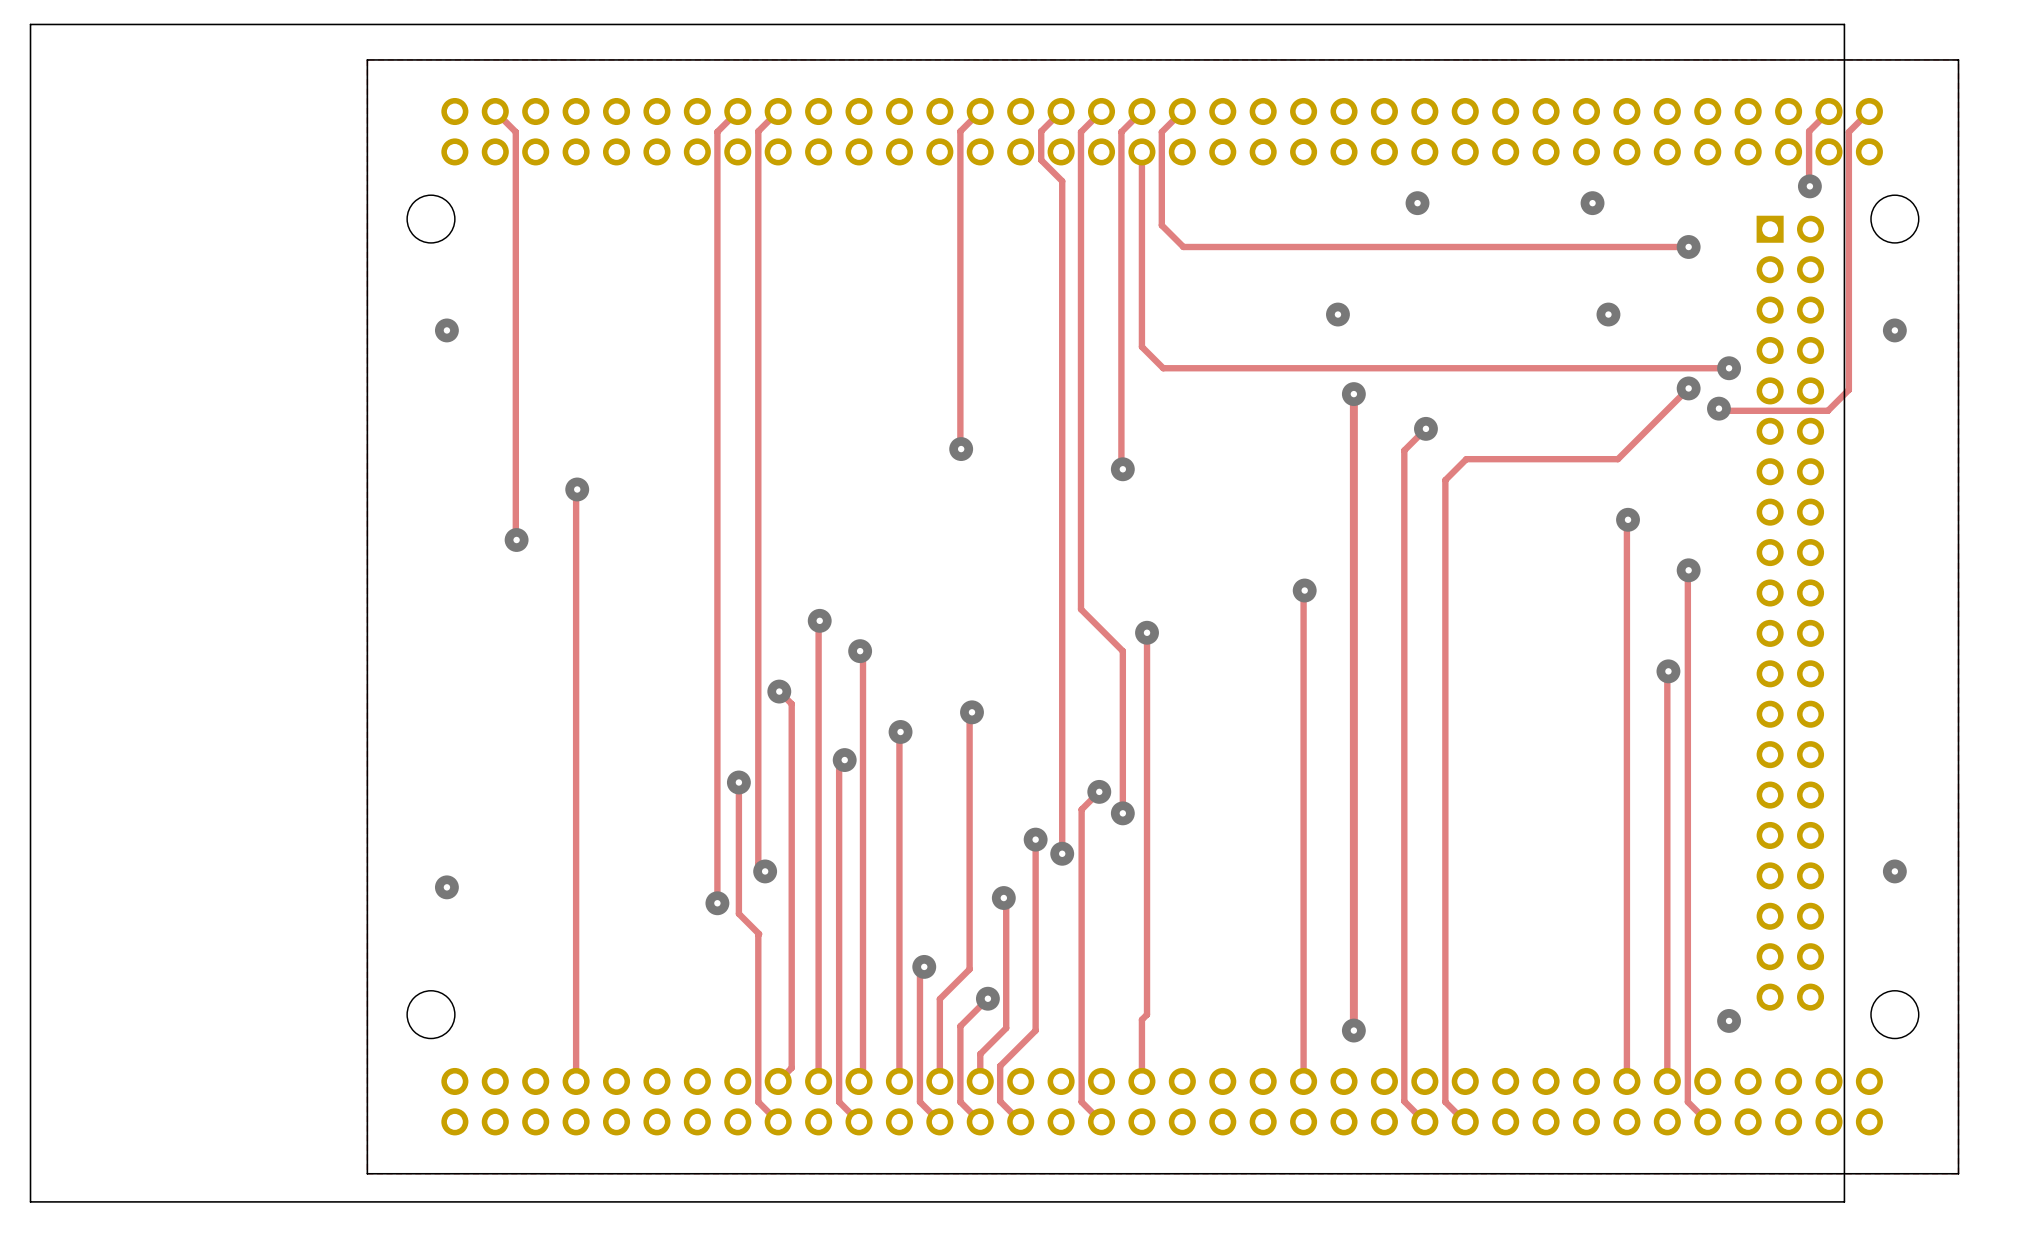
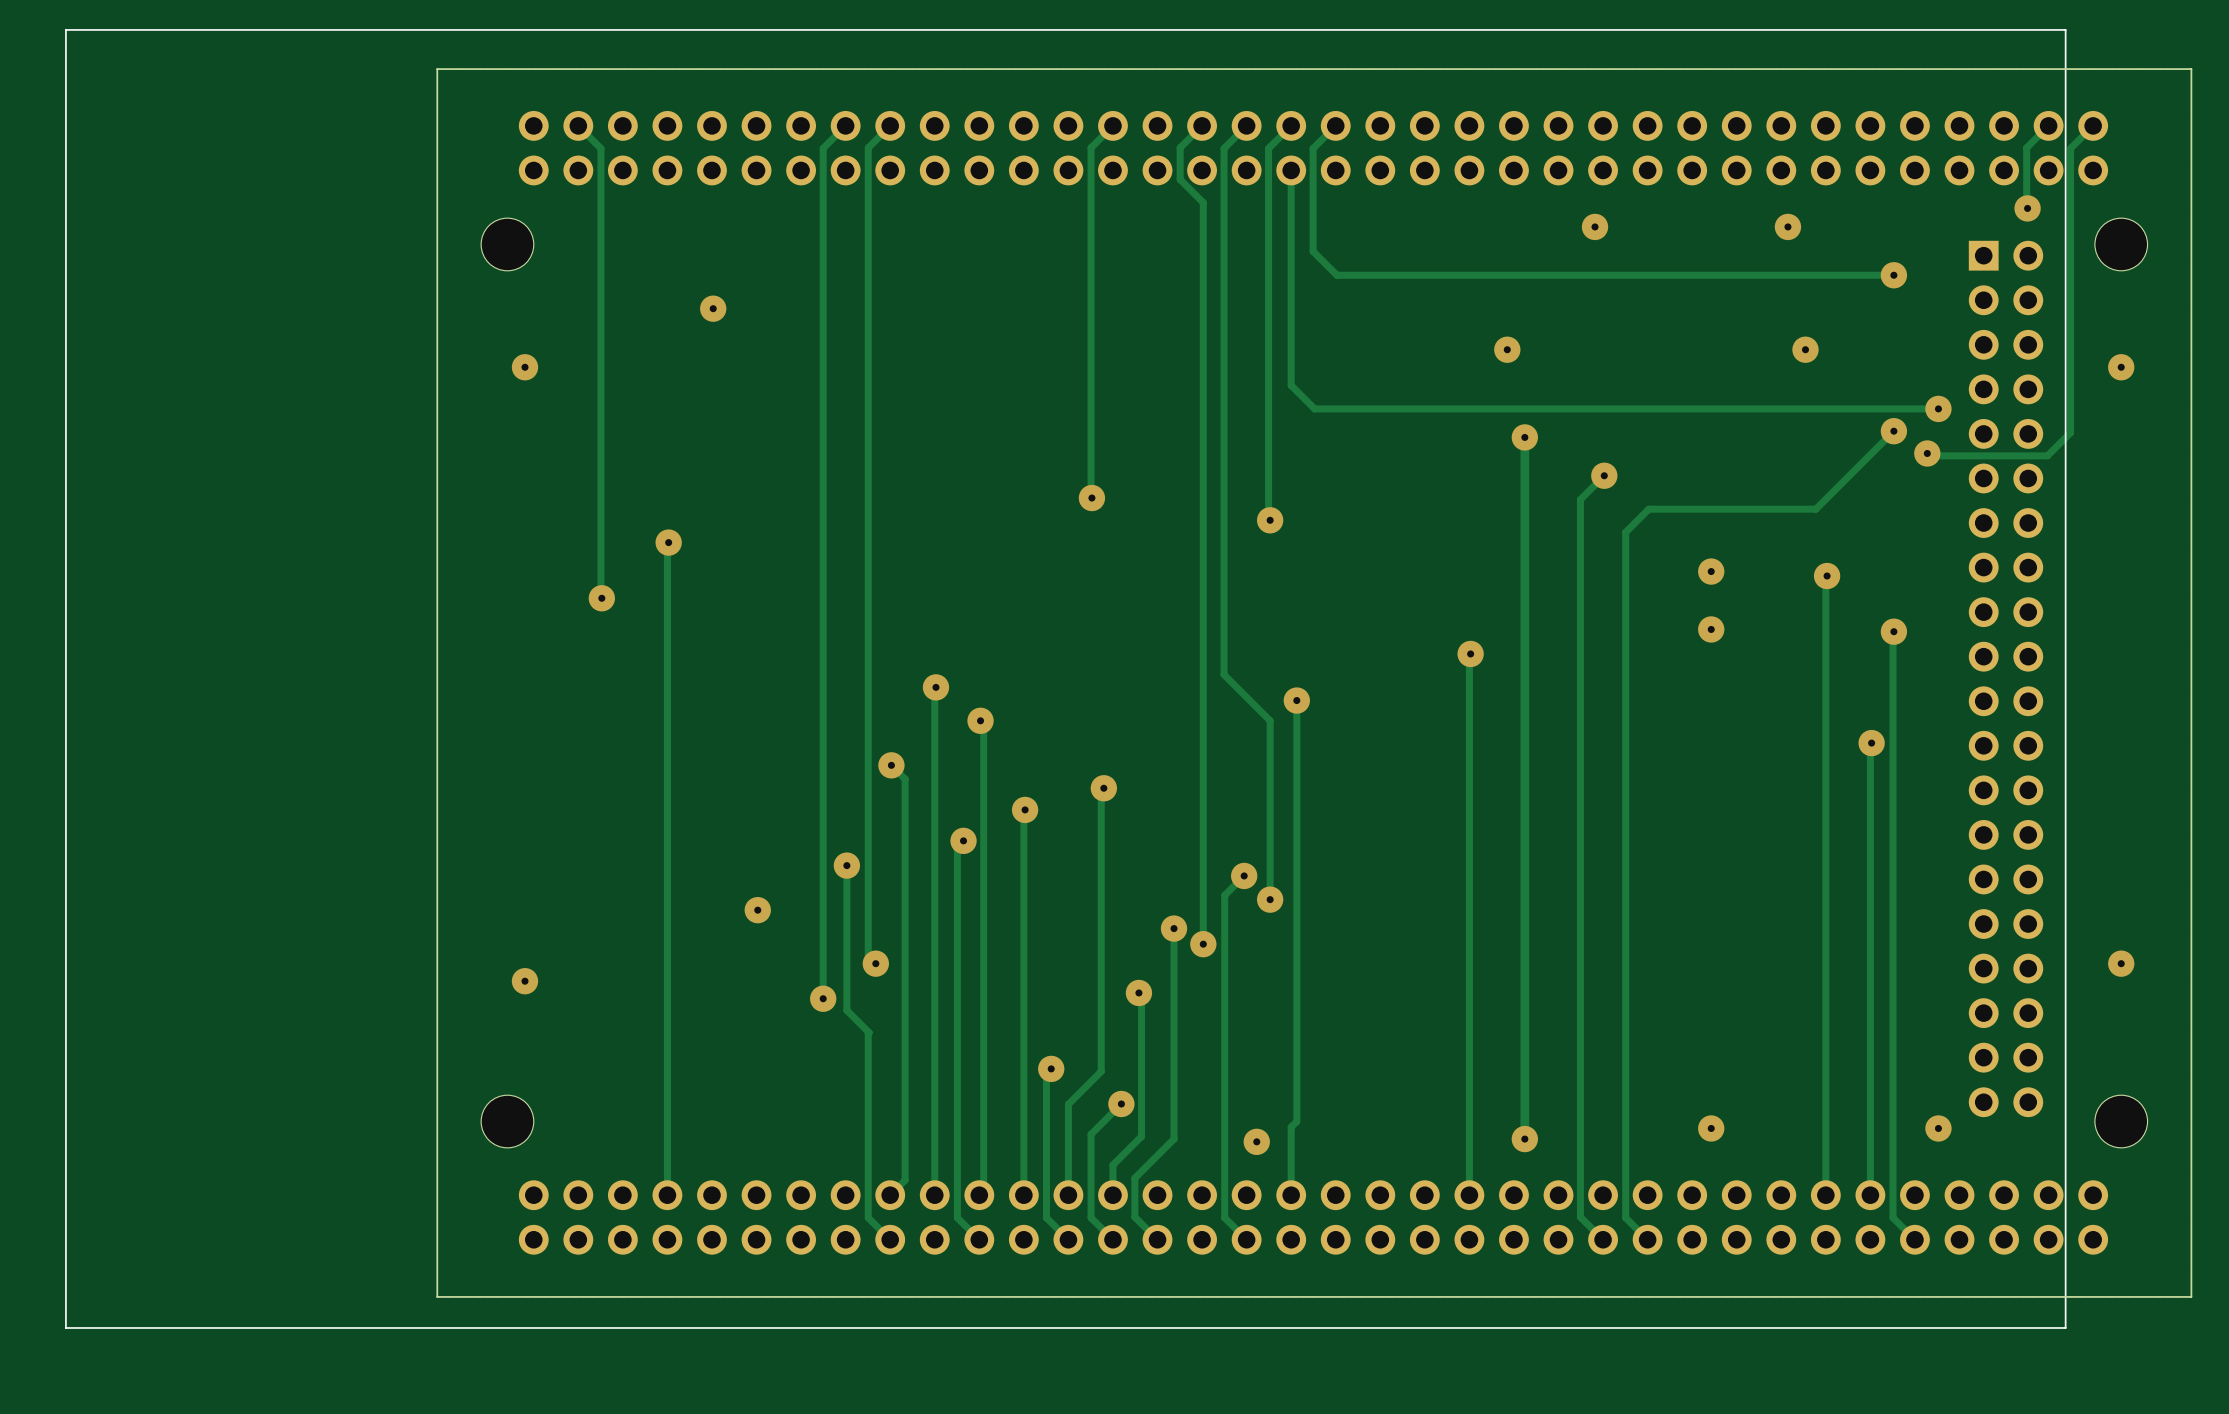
via: none -> (713, 308)
via: none -> (1711, 571)
via: none -> (1711, 629)
via: none -> (757, 910)
via: none -> (1711, 1128)
via: none -> (1256, 1141)

